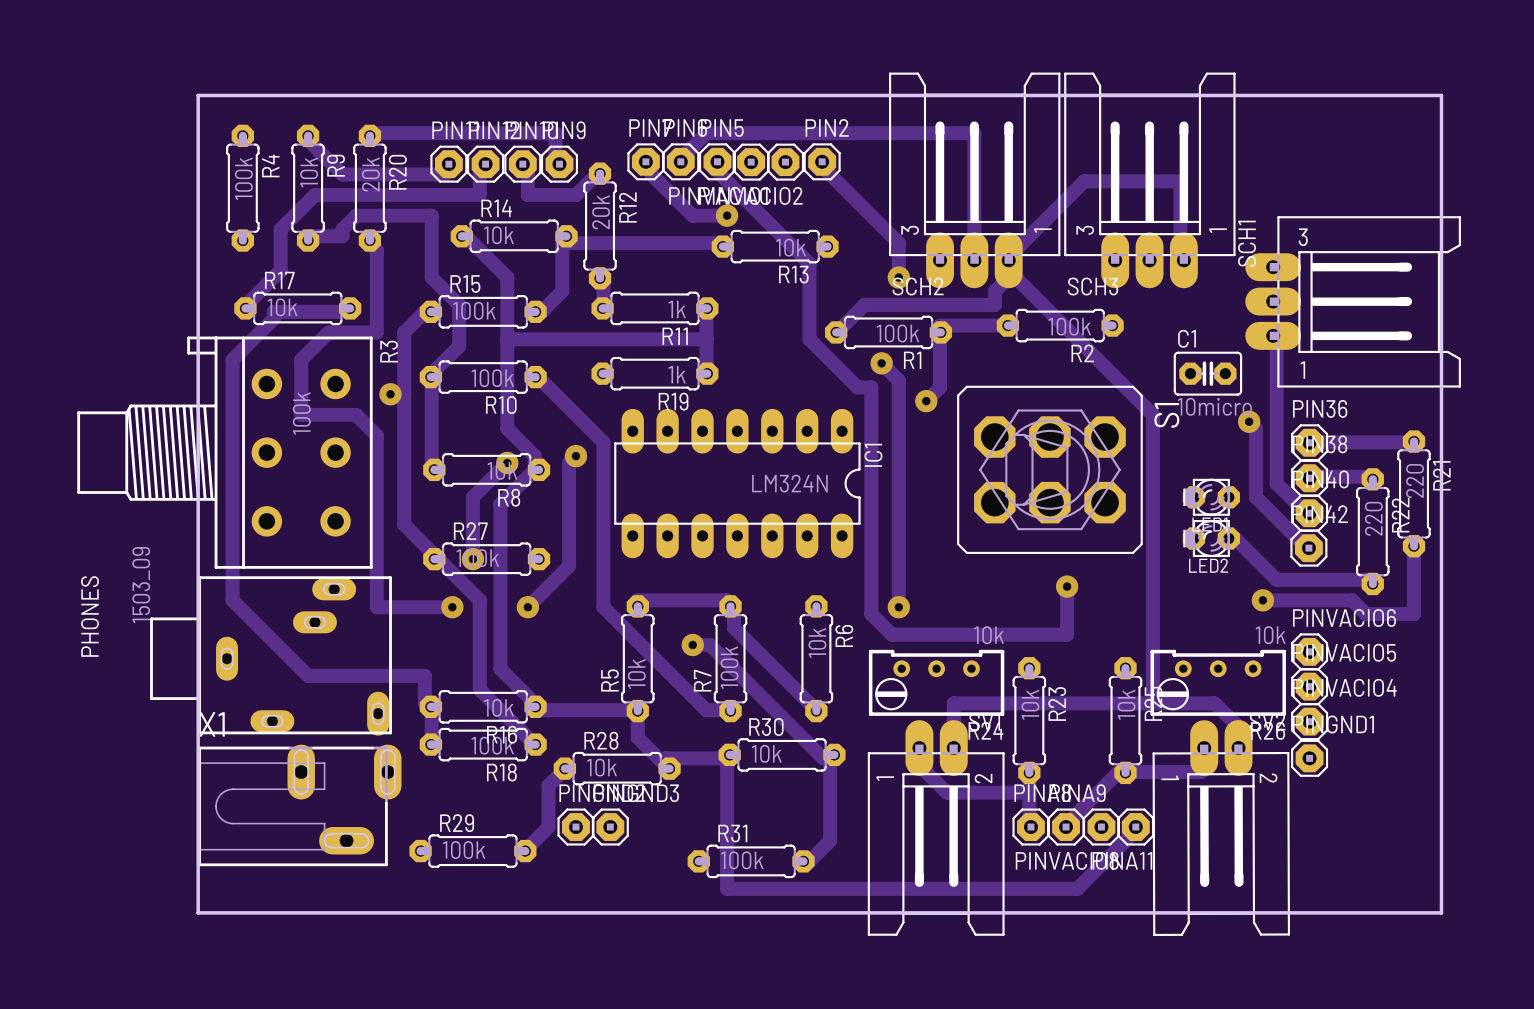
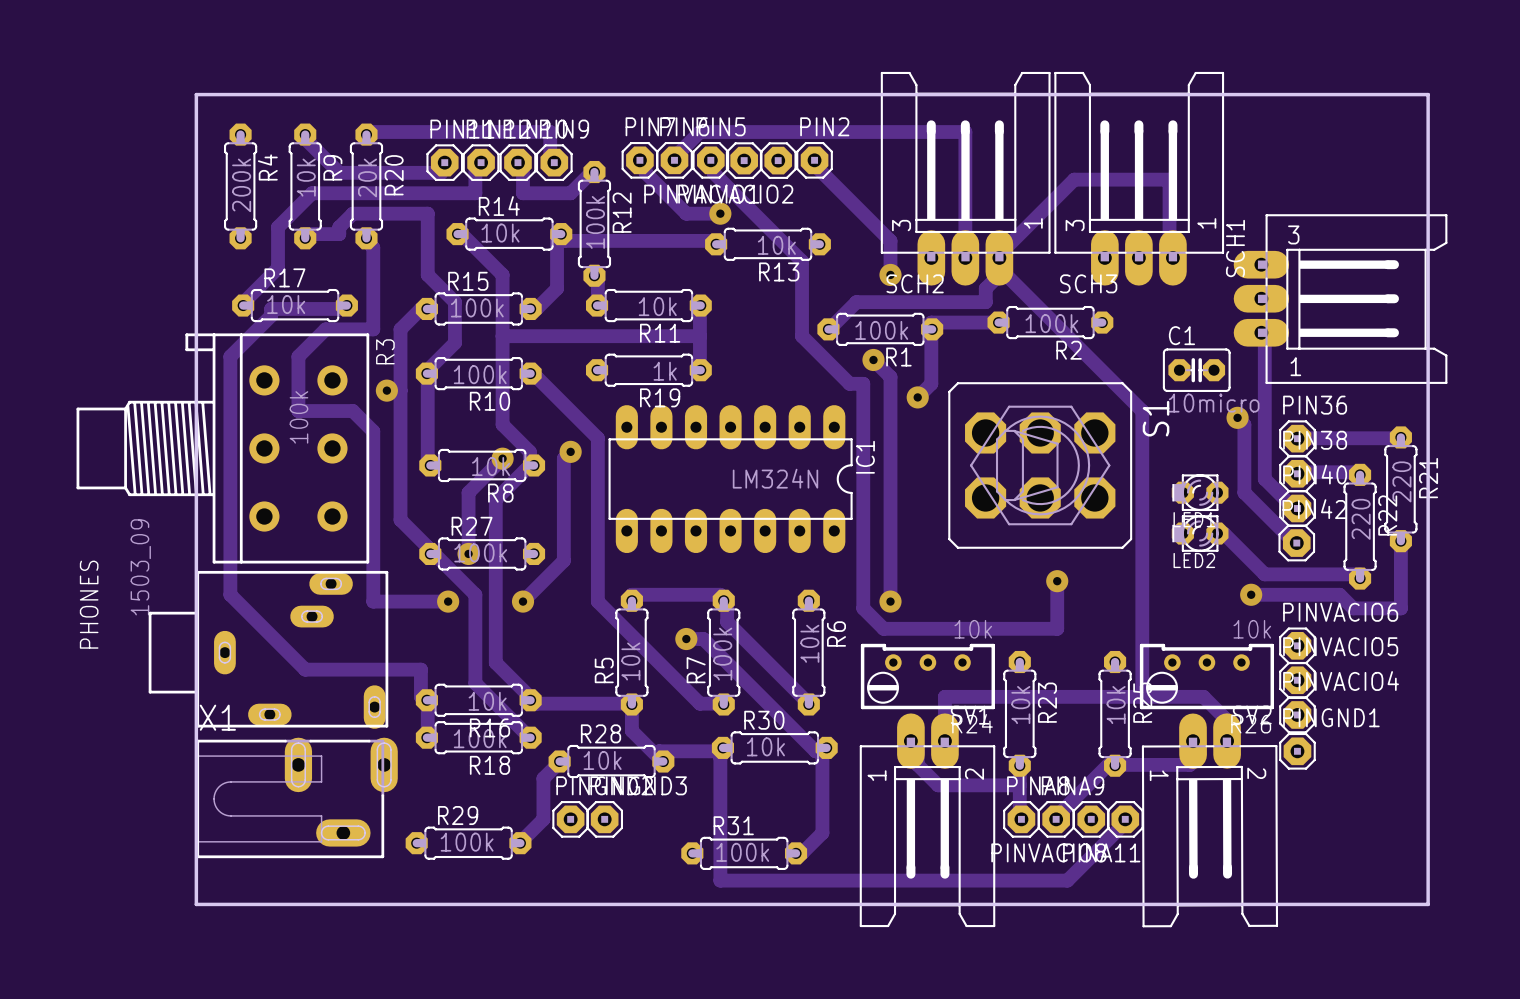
R4 value: 100k (243, 178) -> 200k (241, 185)
R12 value: 20k (601, 212) -> 100k (595, 222)
R11 value: 1k (677, 309) -> 10k (657, 306)

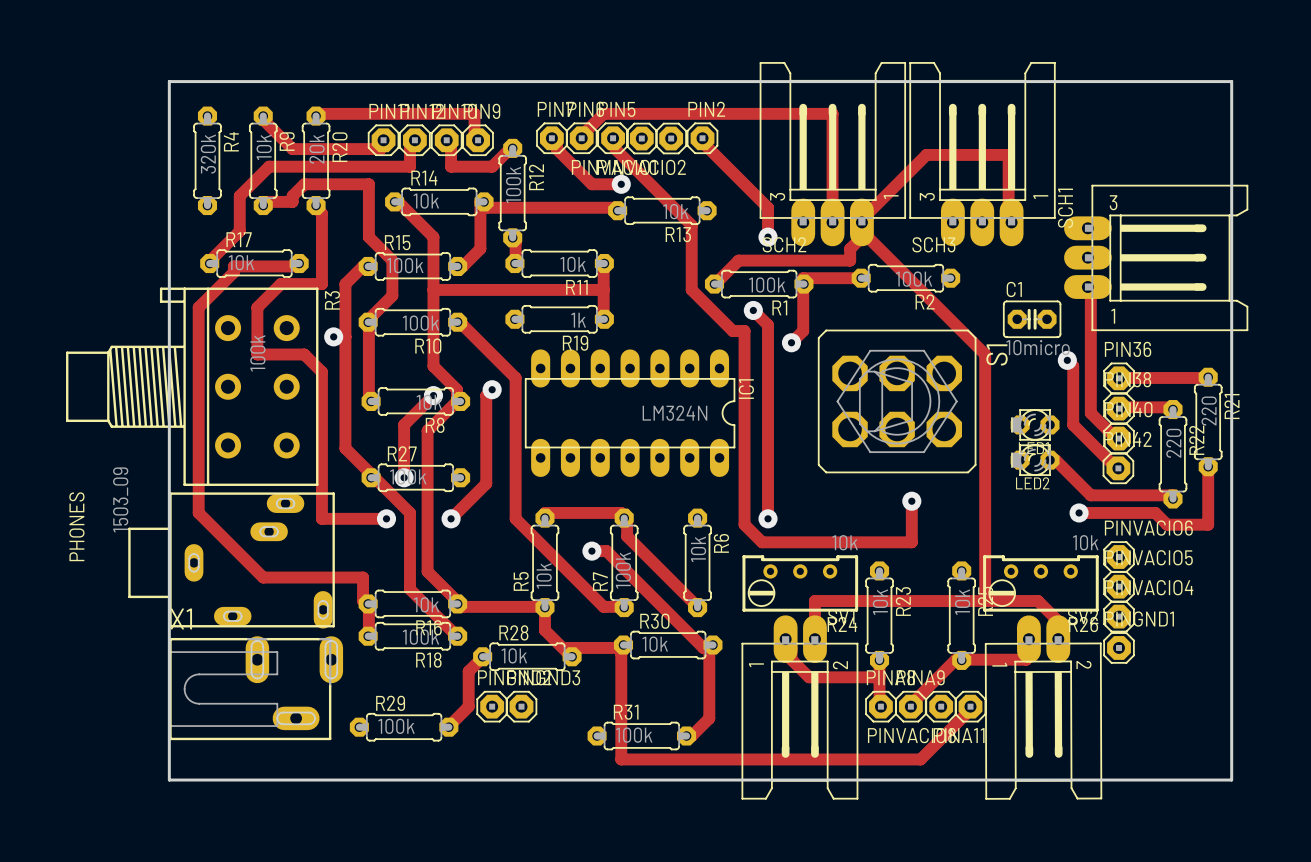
R4 value: 200k (241, 185) -> 320k (208, 154)

